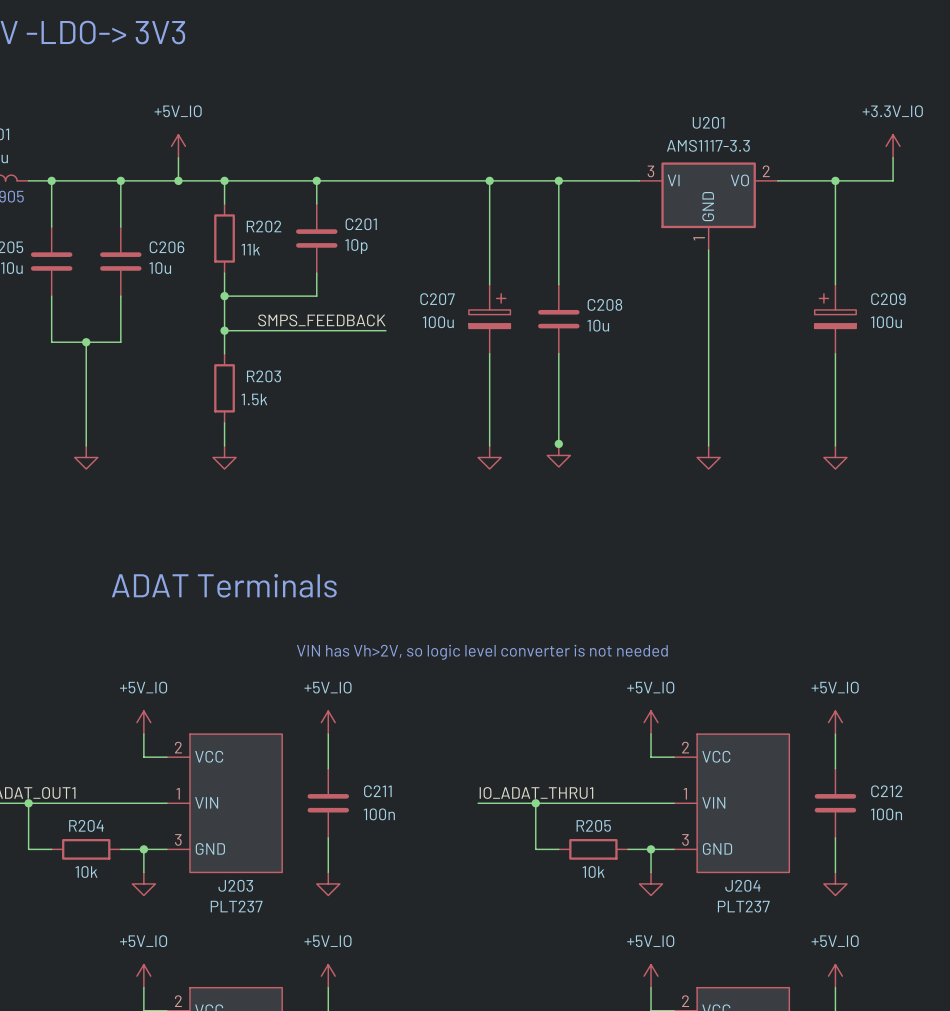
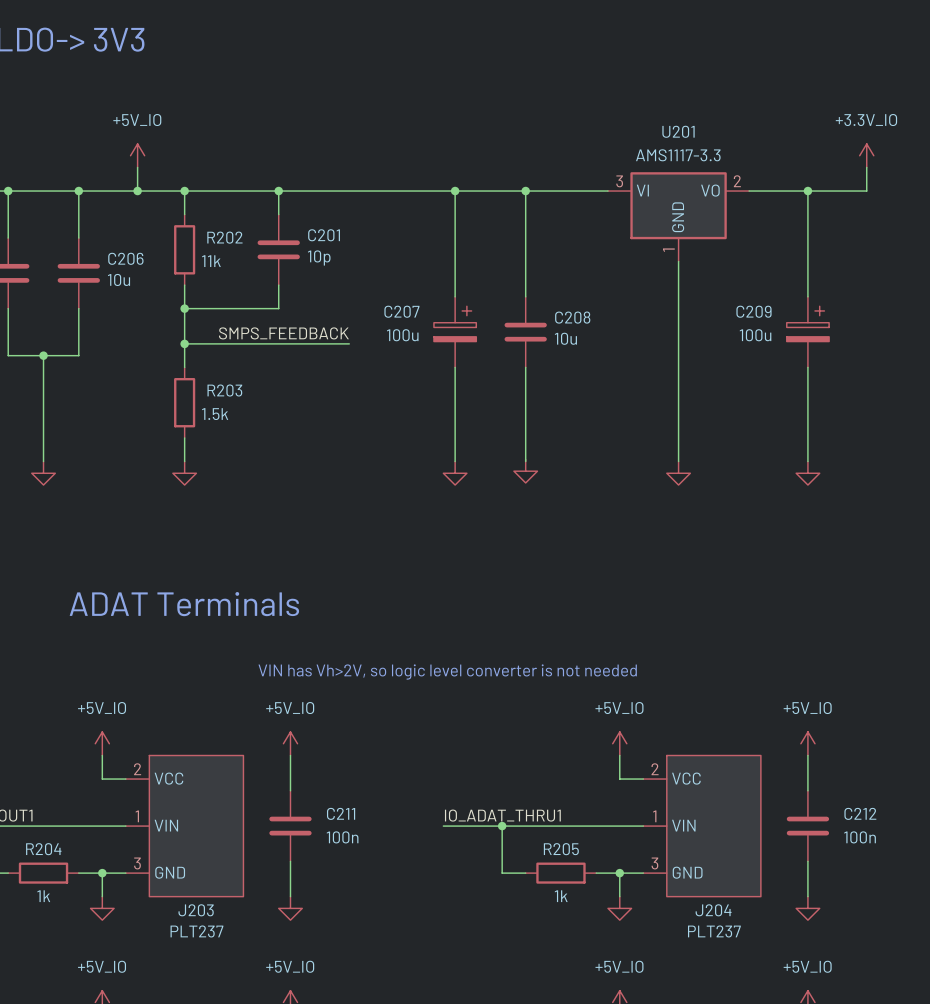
C209 flip: as is (835, 311) -> left-right (807, 323)
junction: (558, 443) -> none
R204 value: 10k (86, 872) -> 1k (43, 896)
R205 value: 10k (593, 872) -> 1k (561, 896)

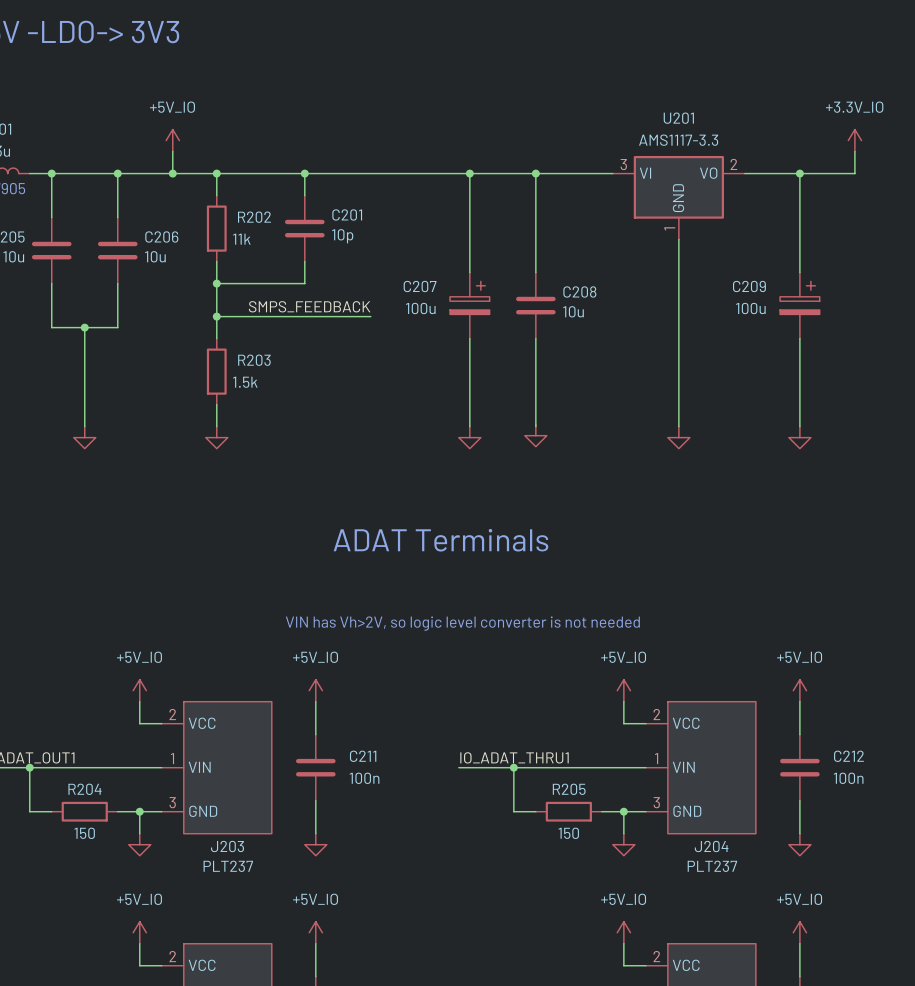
text: none -> ADAT Terminals (440, 540)
text: ADAT Terminals (184, 604) -> none
R204 value: 1k (43, 896) -> 150 (84, 833)
R205 value: 1k (561, 896) -> 150 (568, 833)

